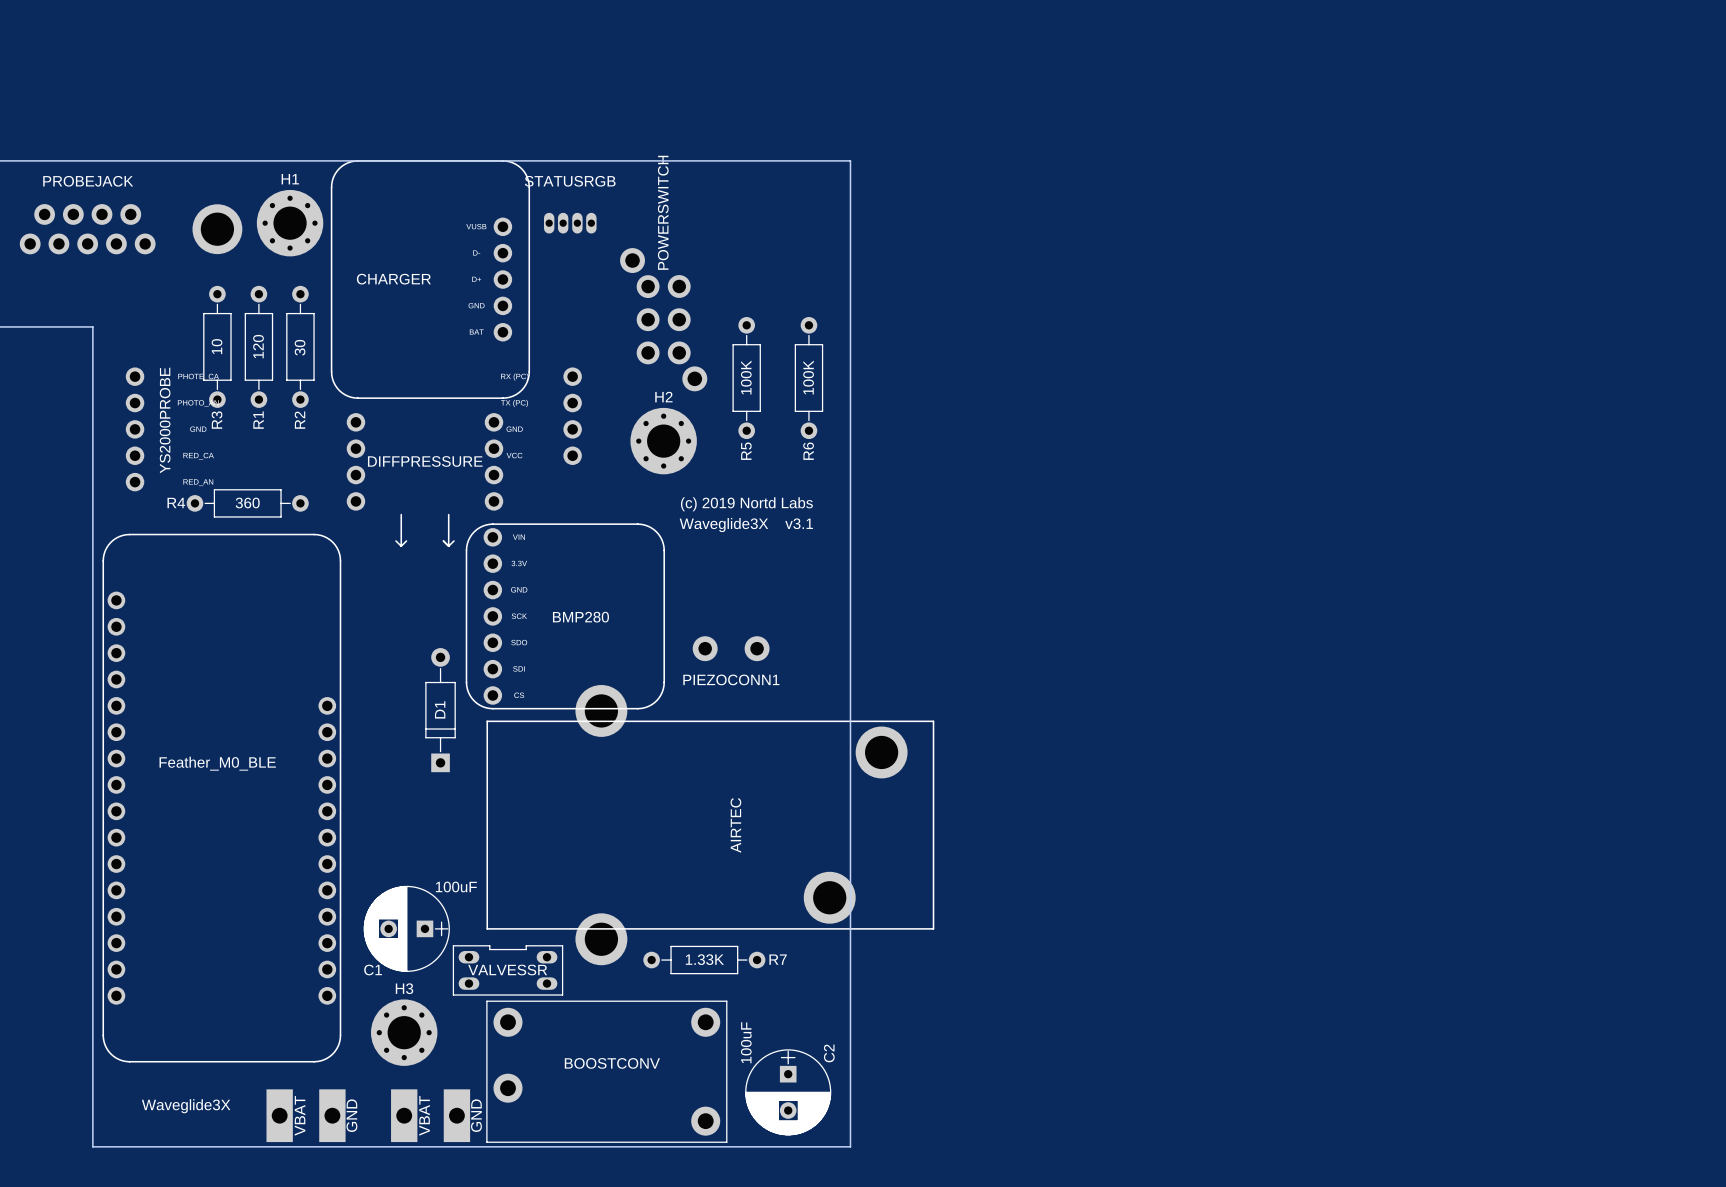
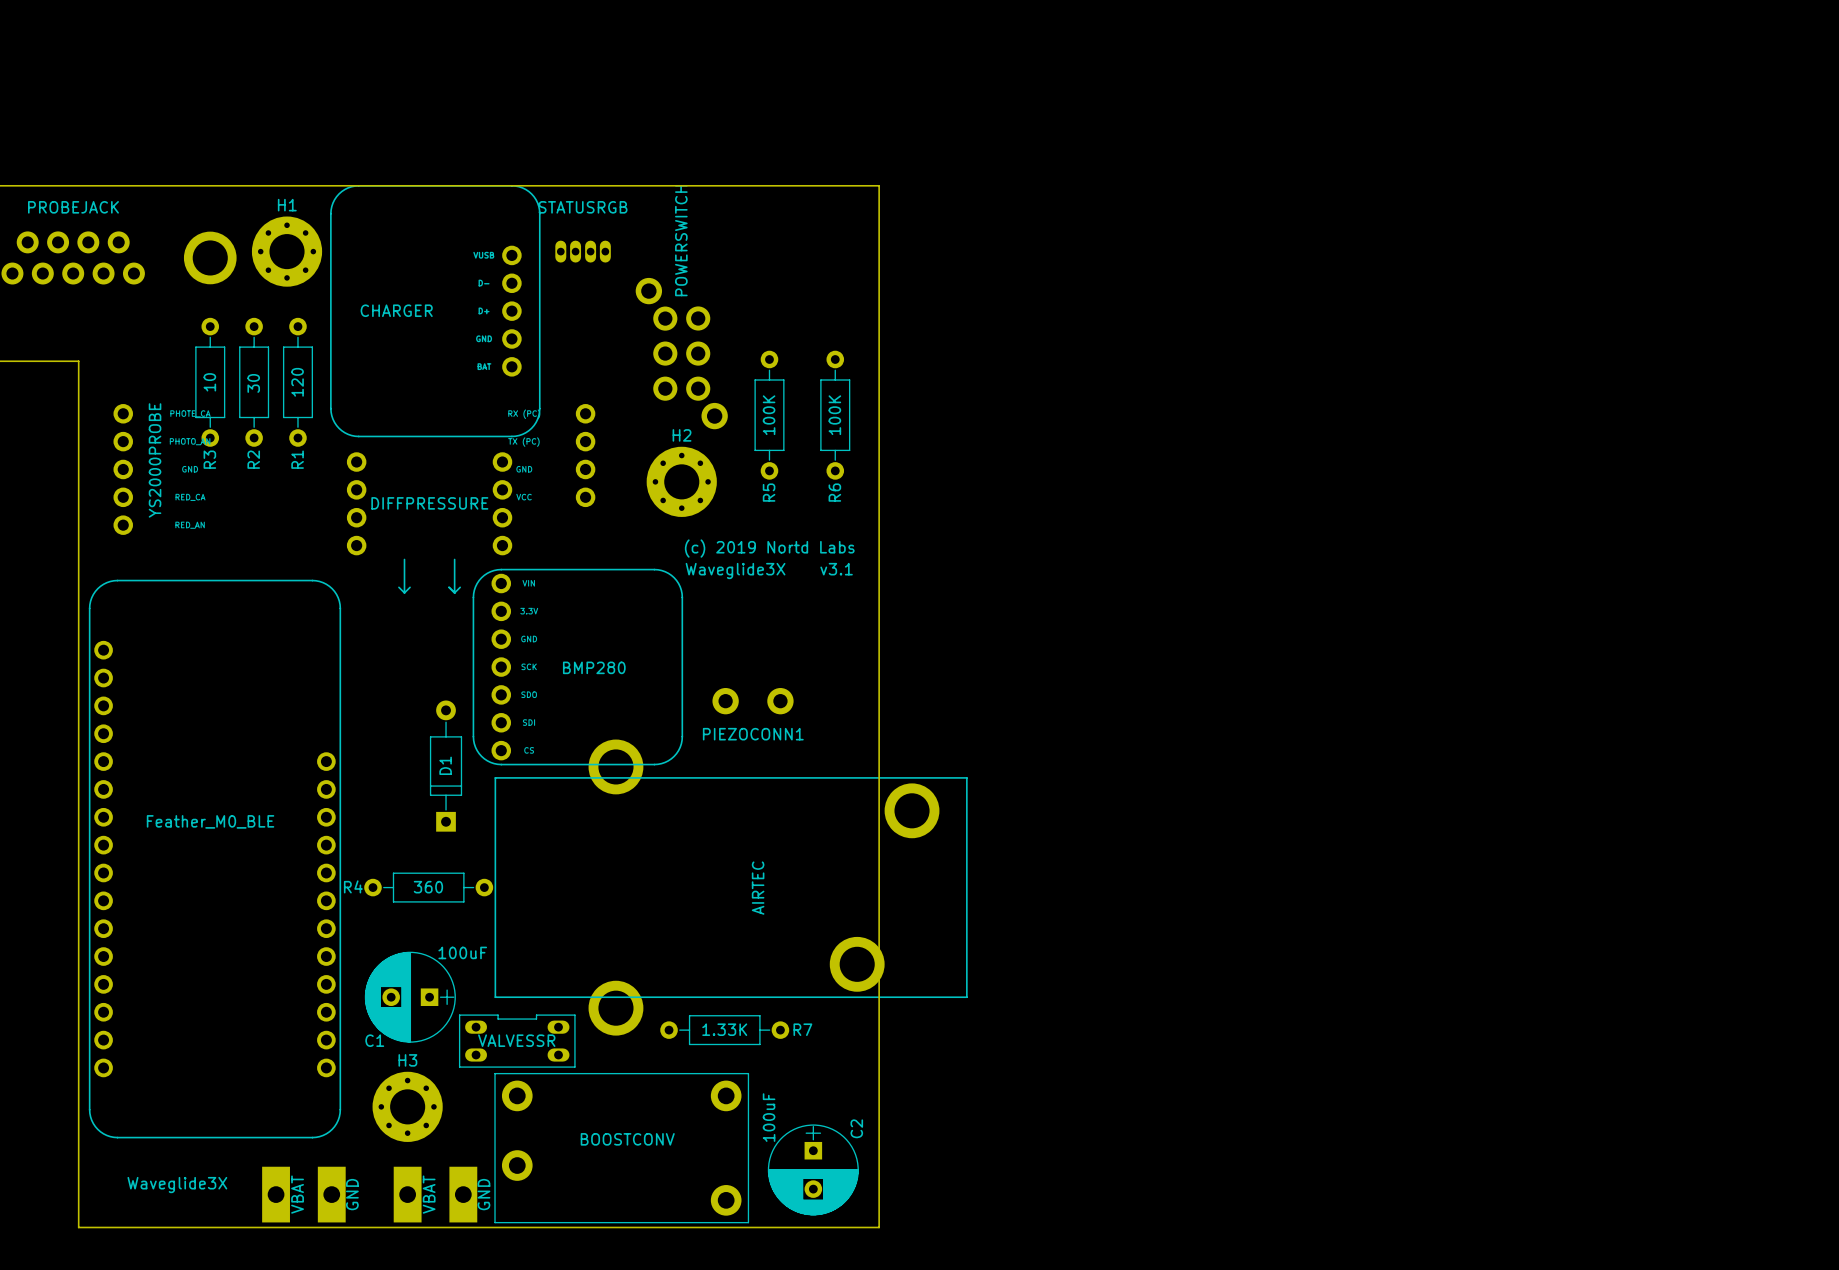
R1 value: 120 (258, 346) -> 30 (253, 383)
R2 value: 30 (300, 347) -> 120 (297, 382)
R1 name: R1 (258, 420) -> R2 (253, 459)
R2 name: R2 (299, 420) -> R1 (297, 459)
R4 position: (247, 503) -> (428, 887)

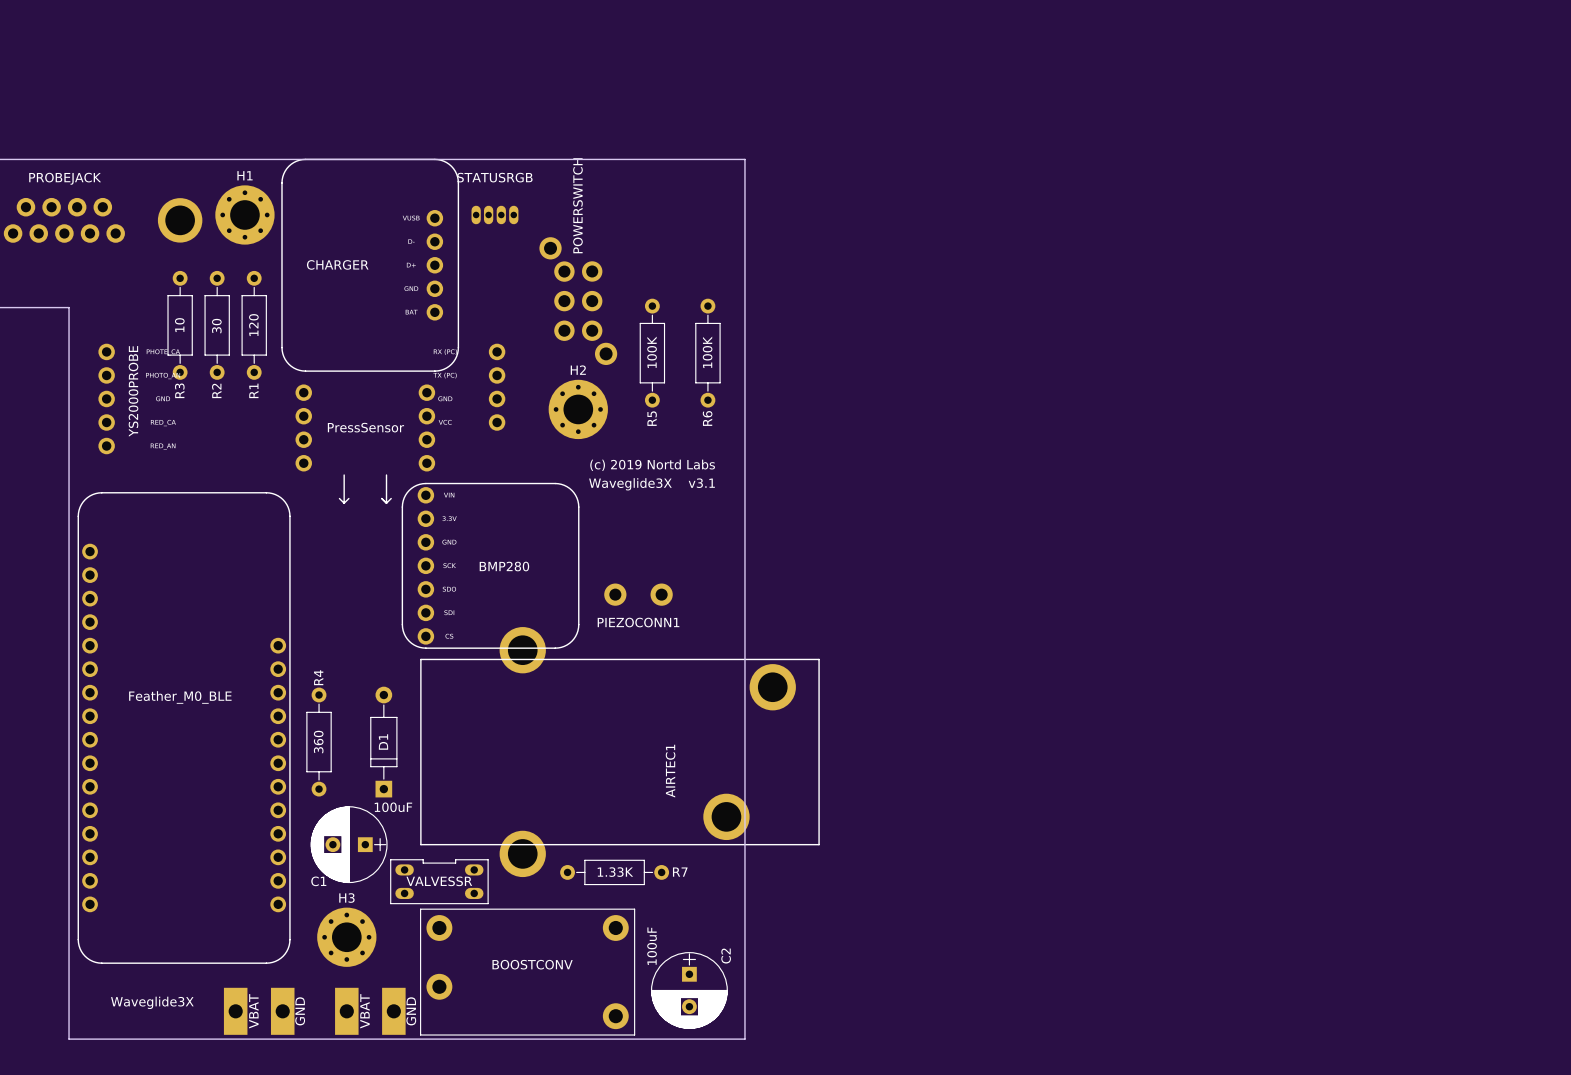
part value: DIFFPRESSURE (429, 503) -> PressSensor (365, 427)
D1 position: (446, 766) -> (383, 742)
R4 rotation: 0° (428, 887) -> 90° clockwise (319, 742)
AIRTEC1 value: AIRTEC (758, 888) -> none
AIRTEC1 name: none -> AIRTEC1 (670, 771)

